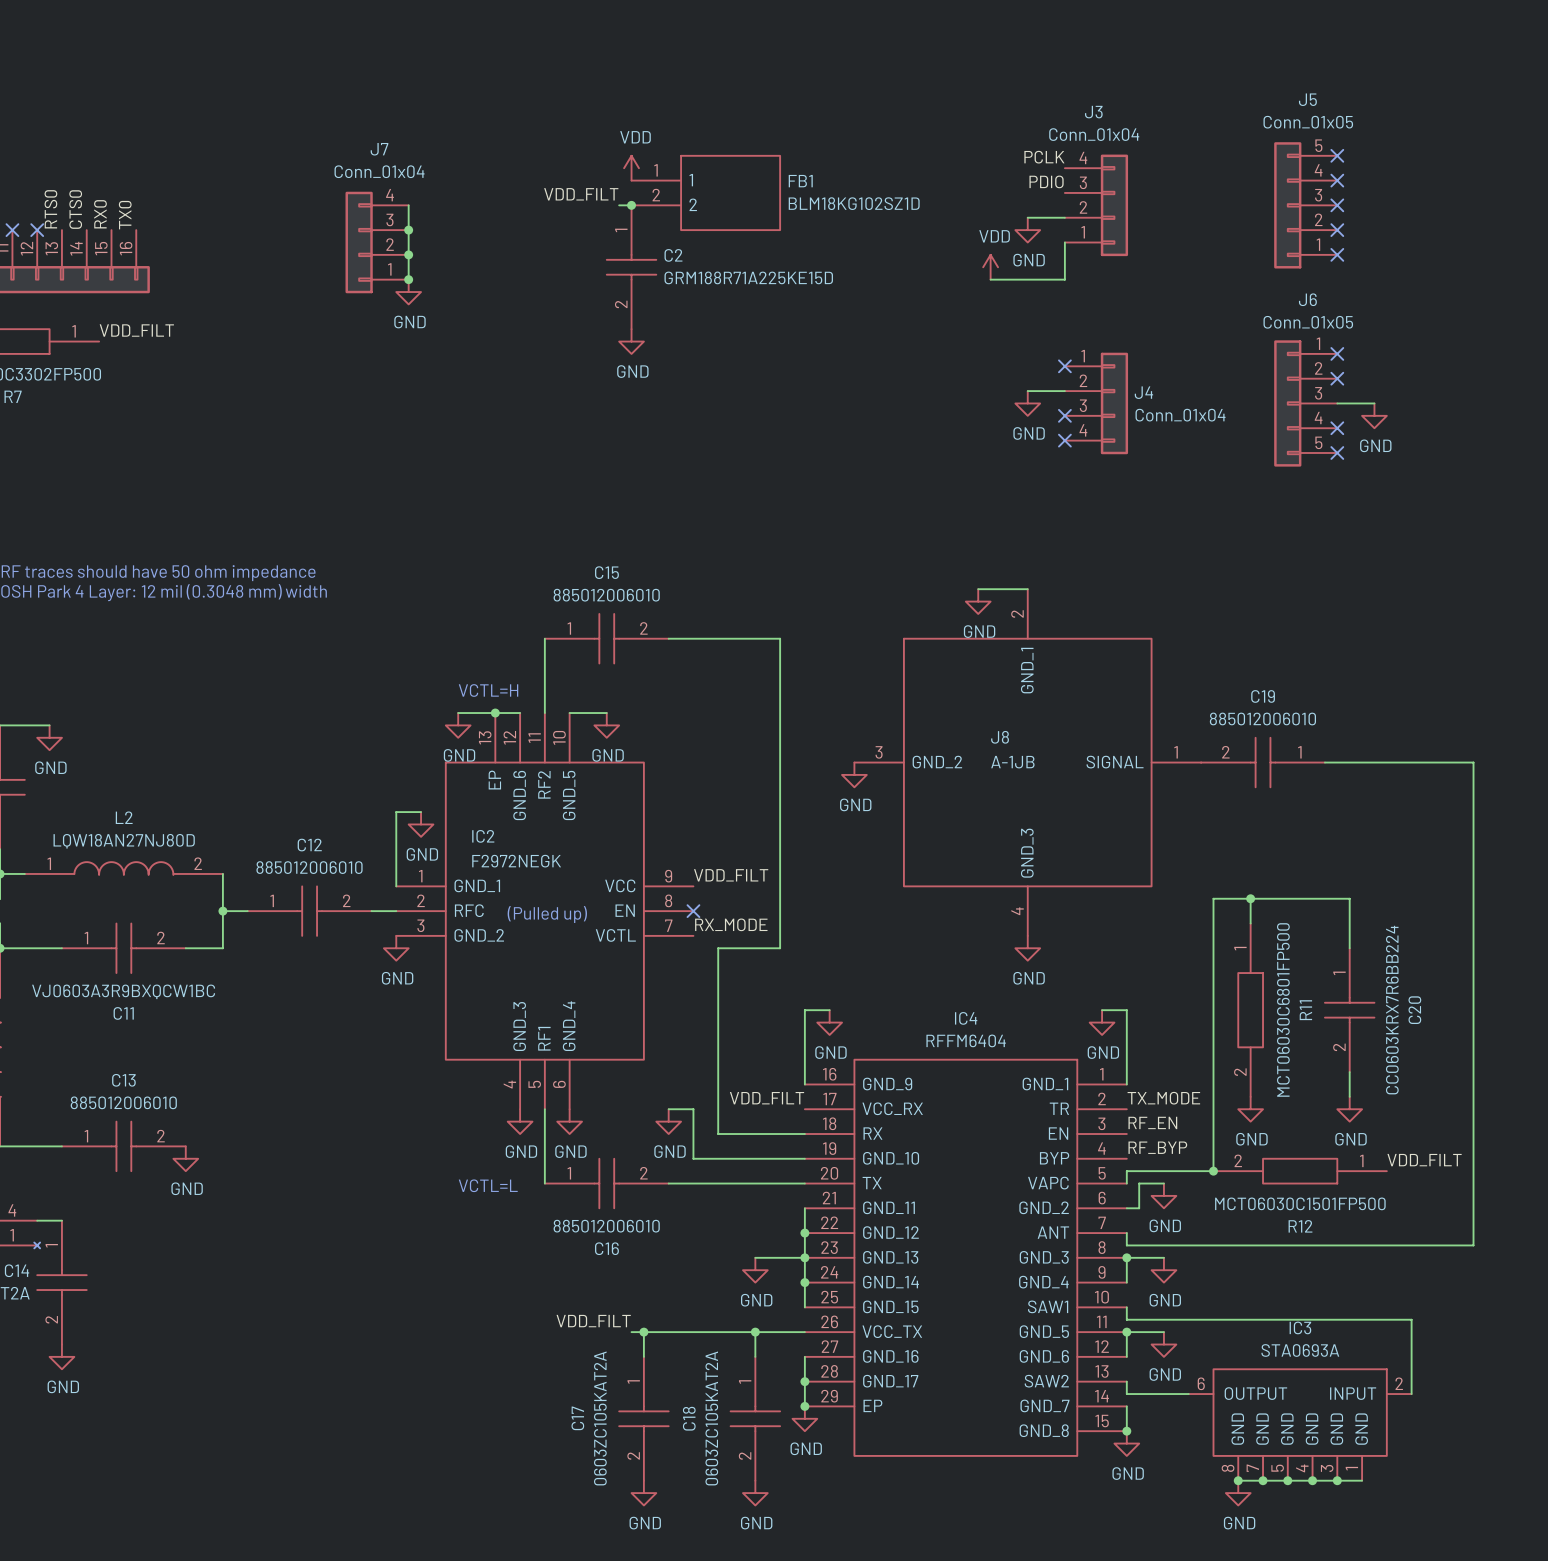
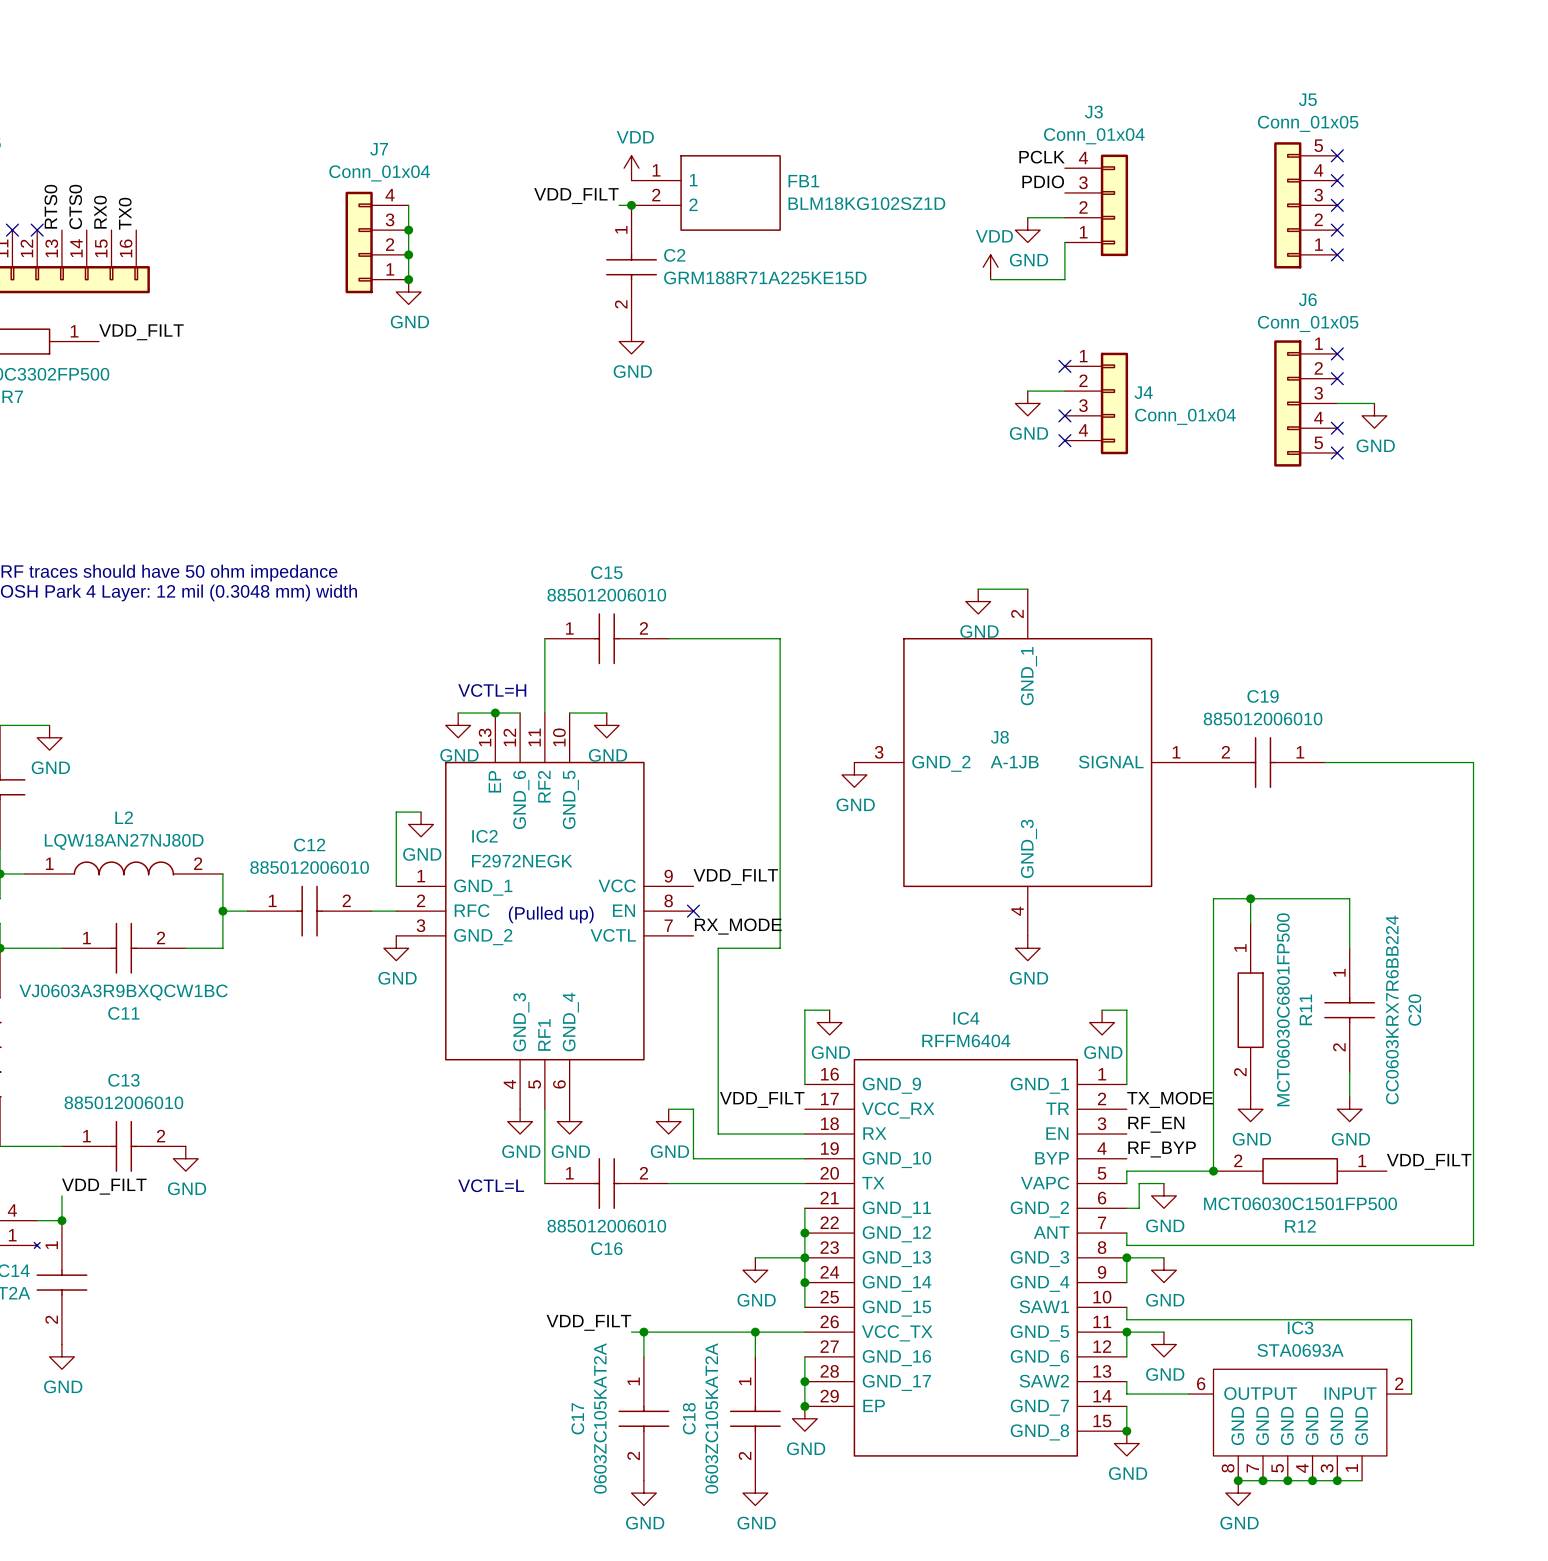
label: none -> VDD_FILT (104, 1186)
wire: none -> (61, 1195) (61, 1220)
junction: none -> (61, 1220)

